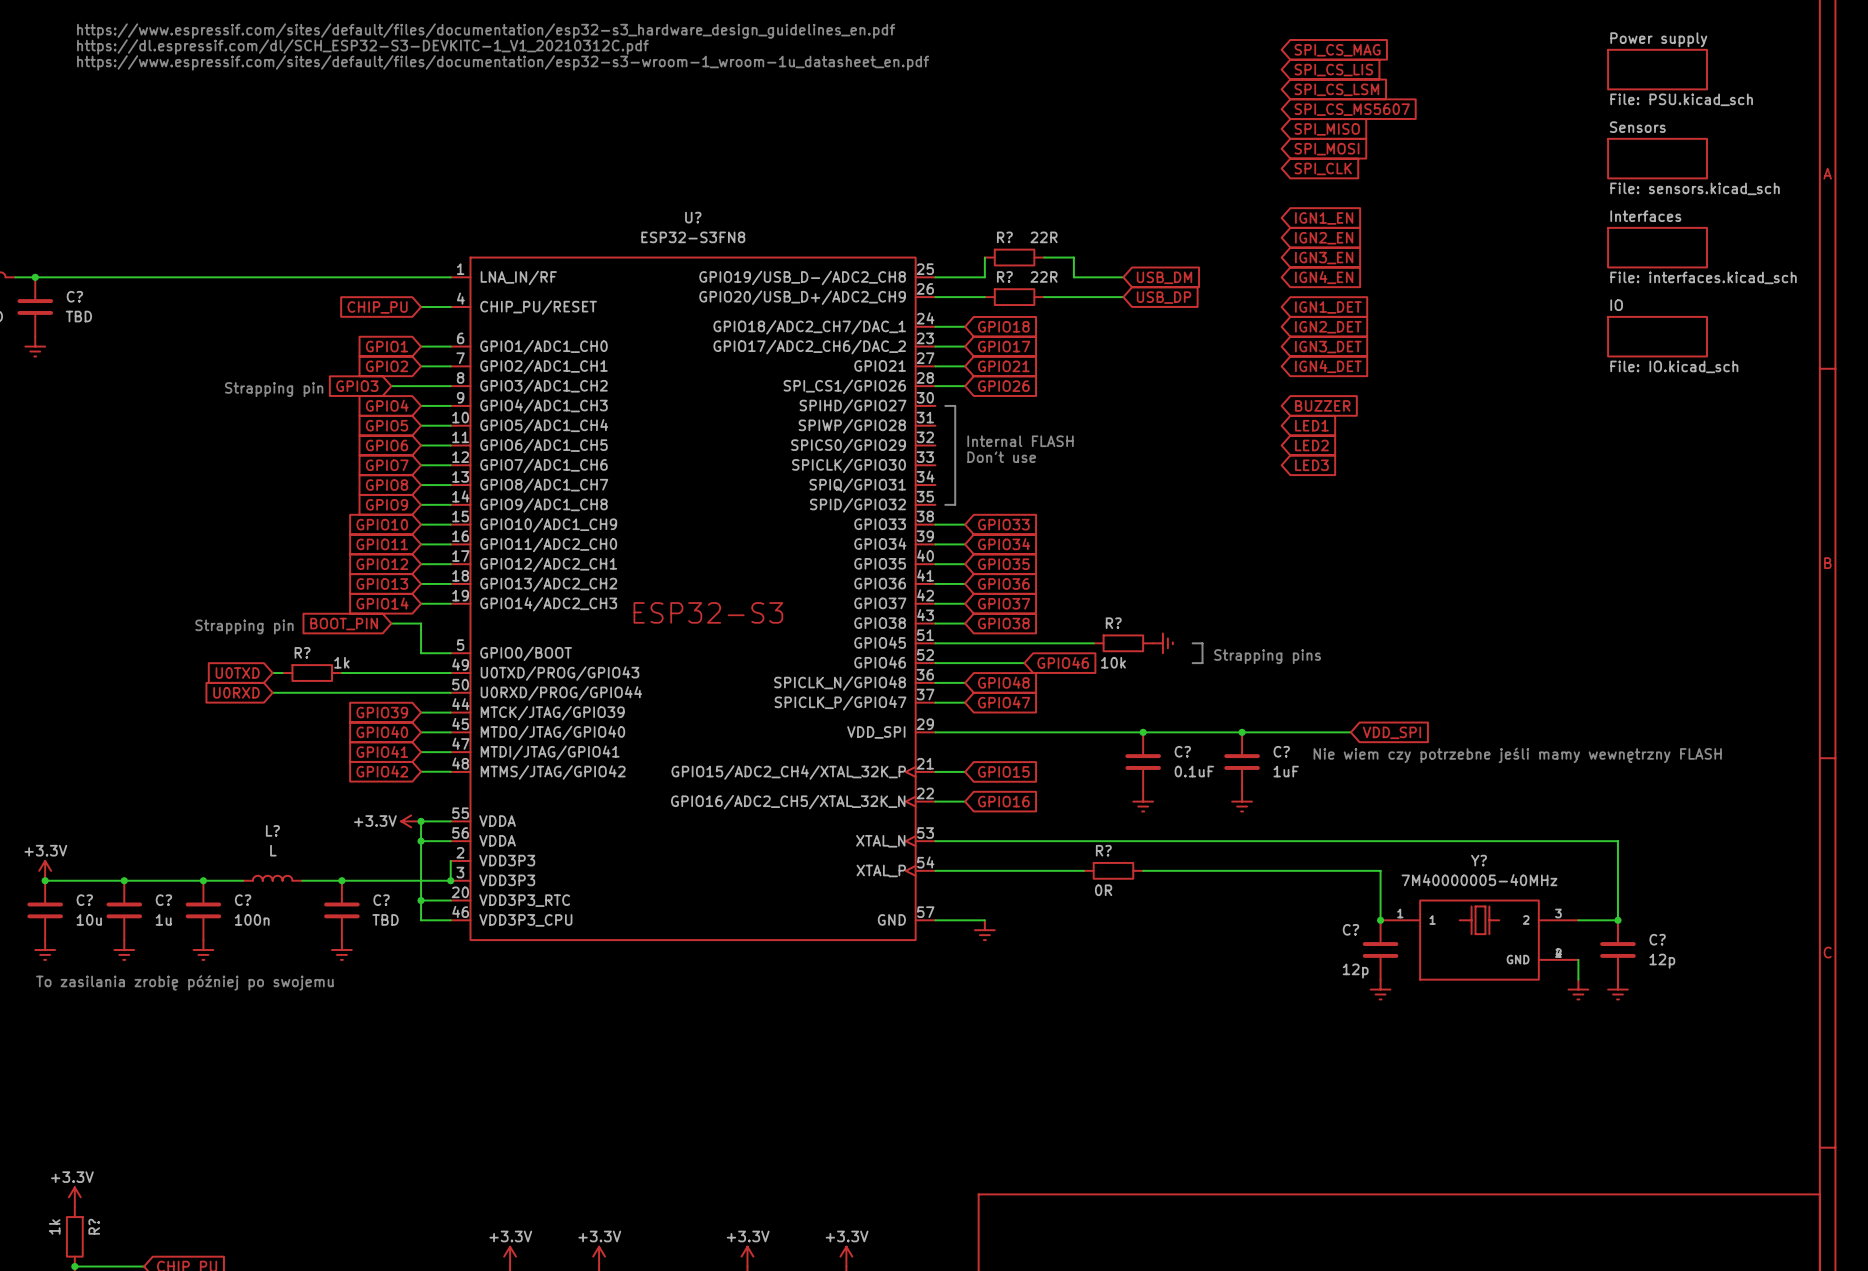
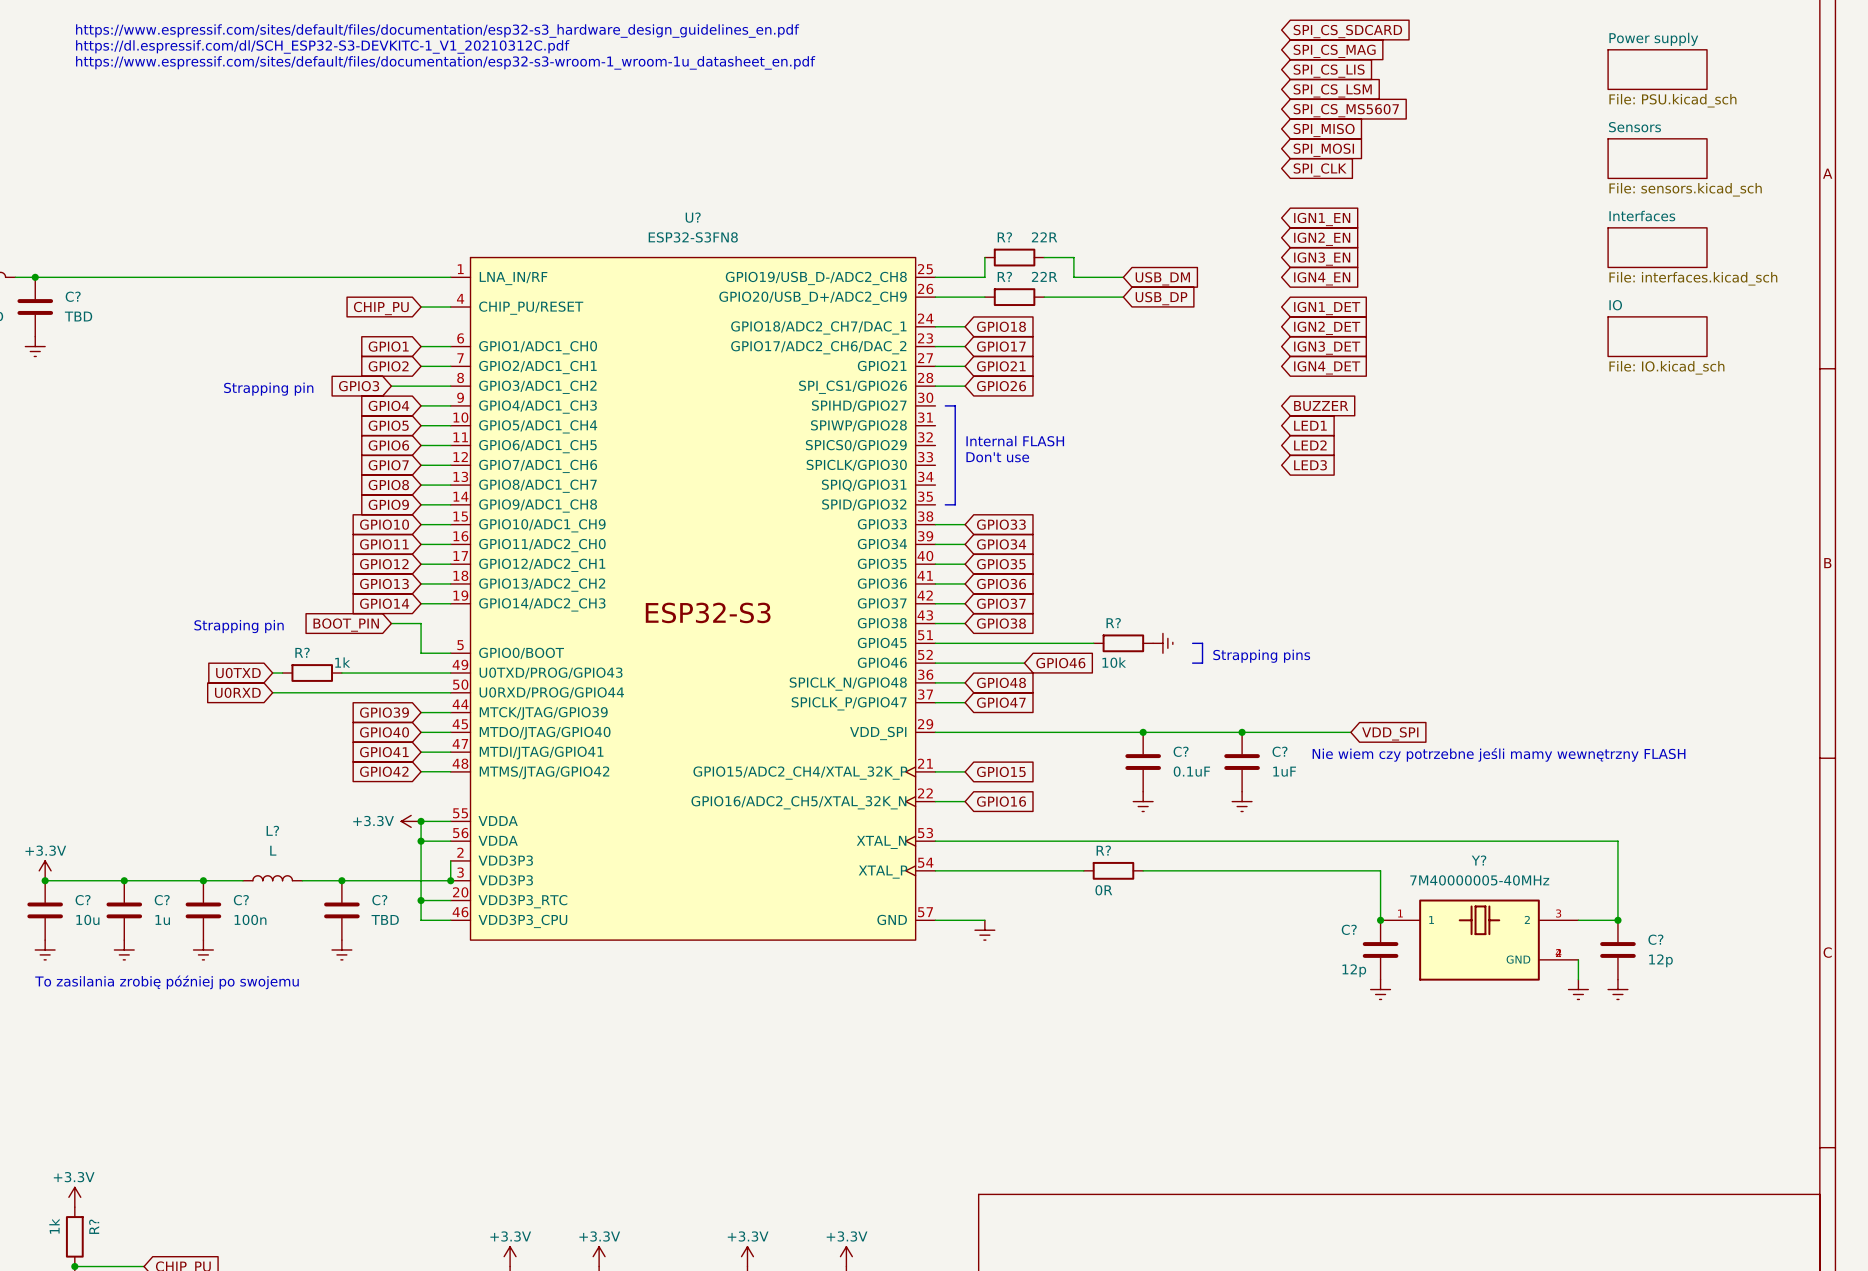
global label: none -> SPI_CS_SDCARD (1347, 31)

